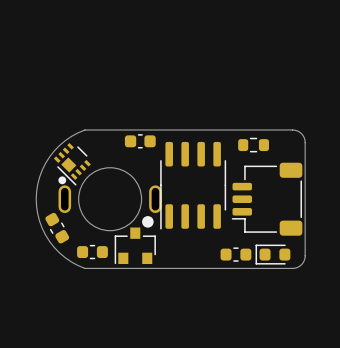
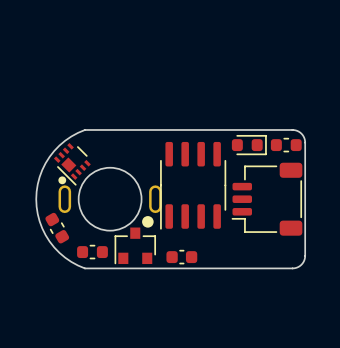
part footprint: [238, 137, 269, 153] -> [231, 135, 267, 156]
part position: (140, 141) -> (181, 257)
part position: (235, 254) -> (286, 145)
part: (272, 254) -> none

